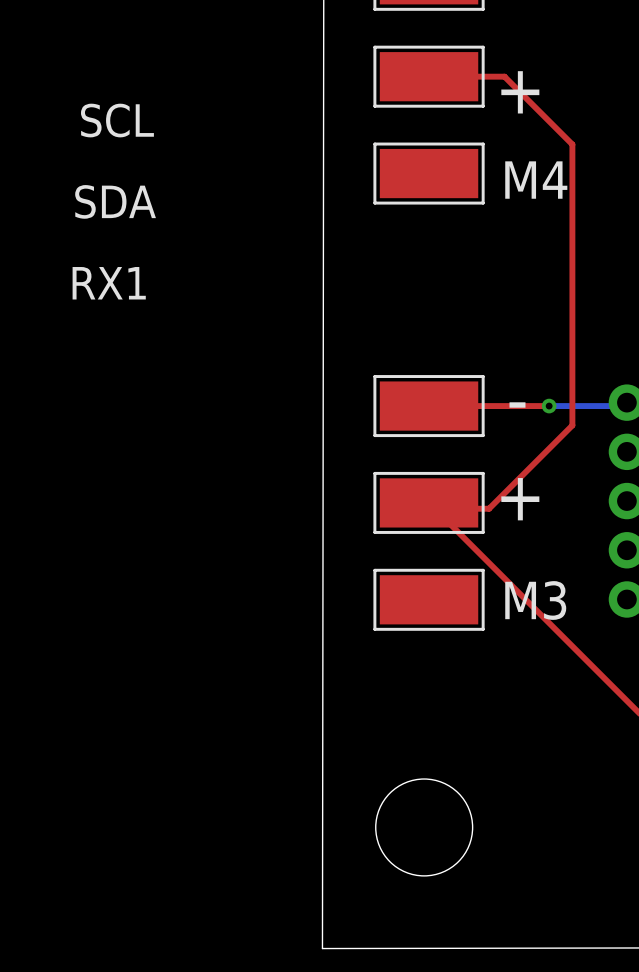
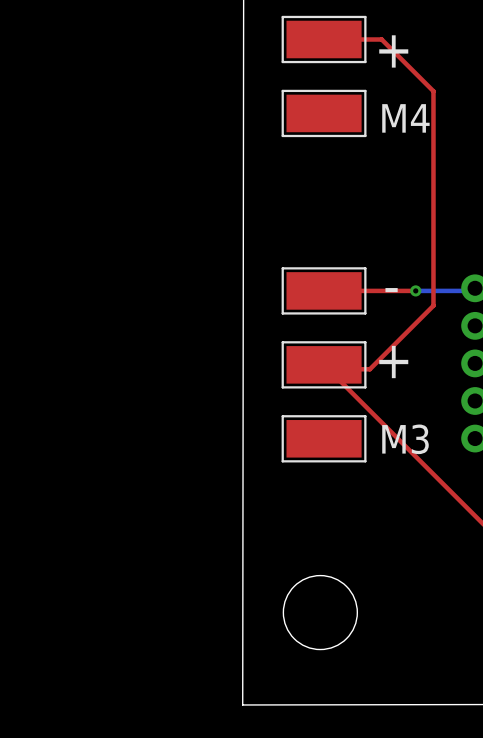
text: SCL (117, 120) -> none
text: SDA (115, 201) -> none
text: RX1 (109, 283) -> none

